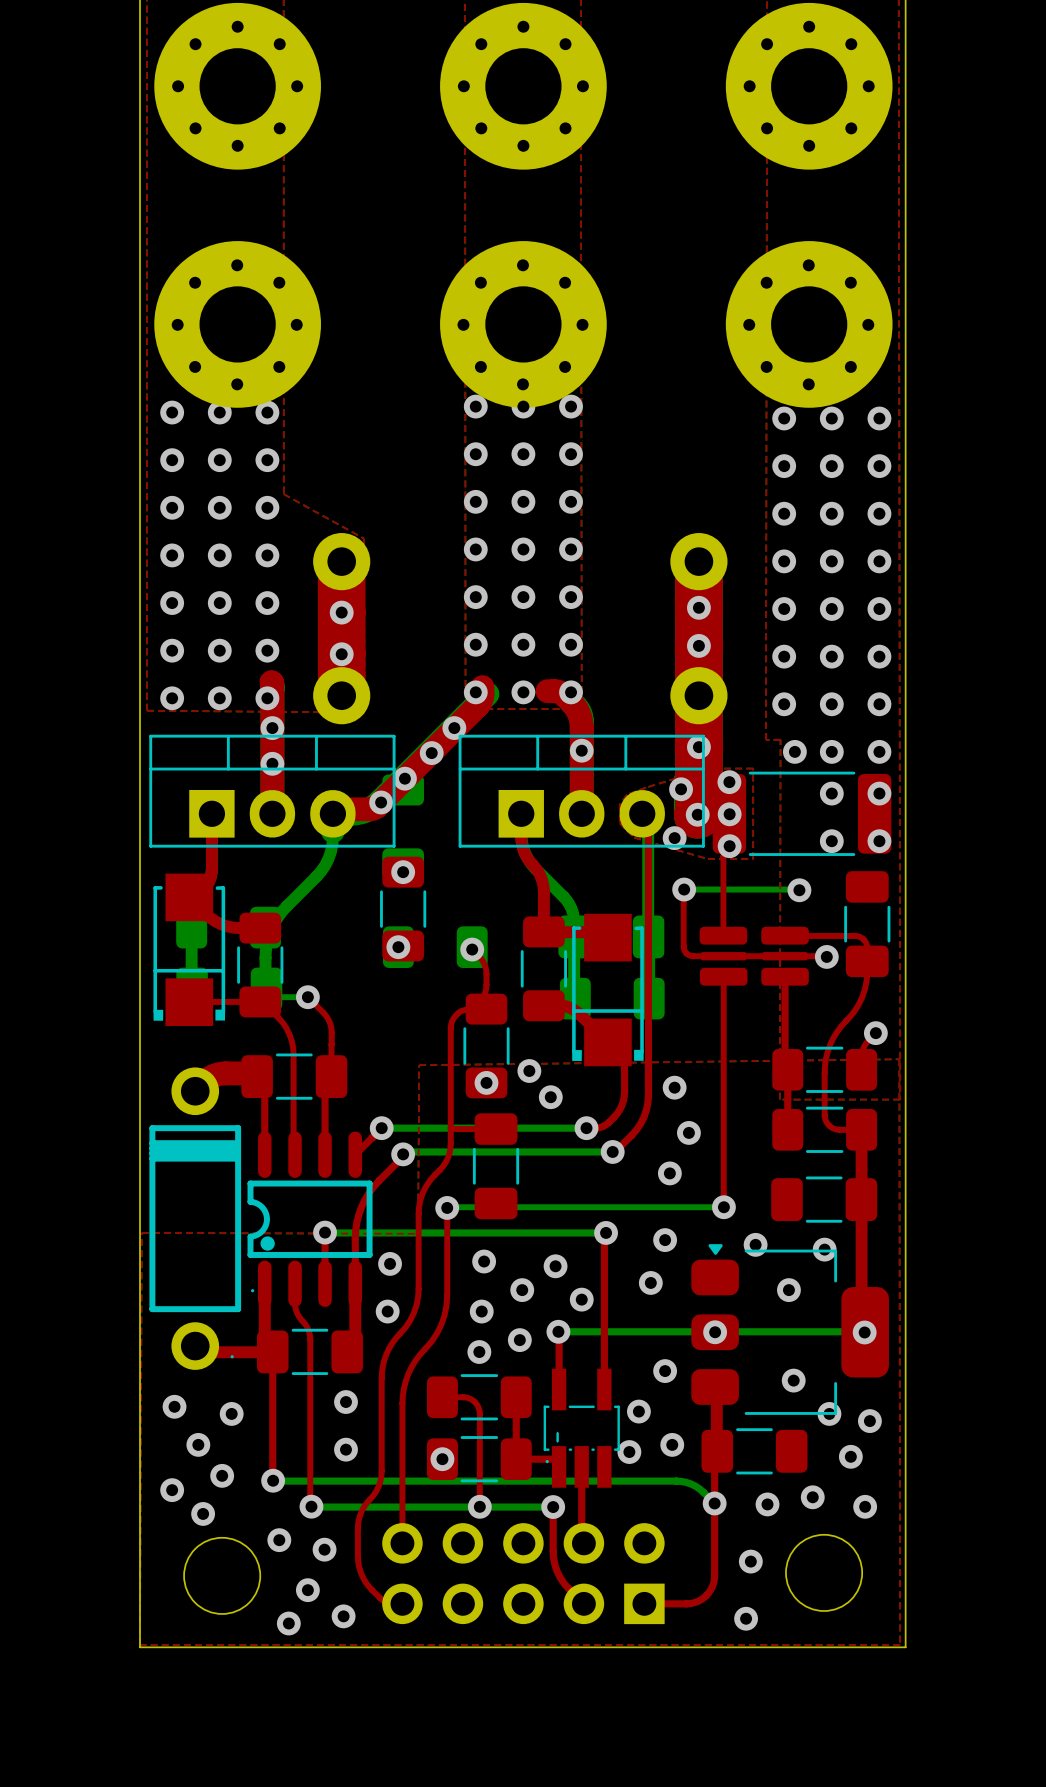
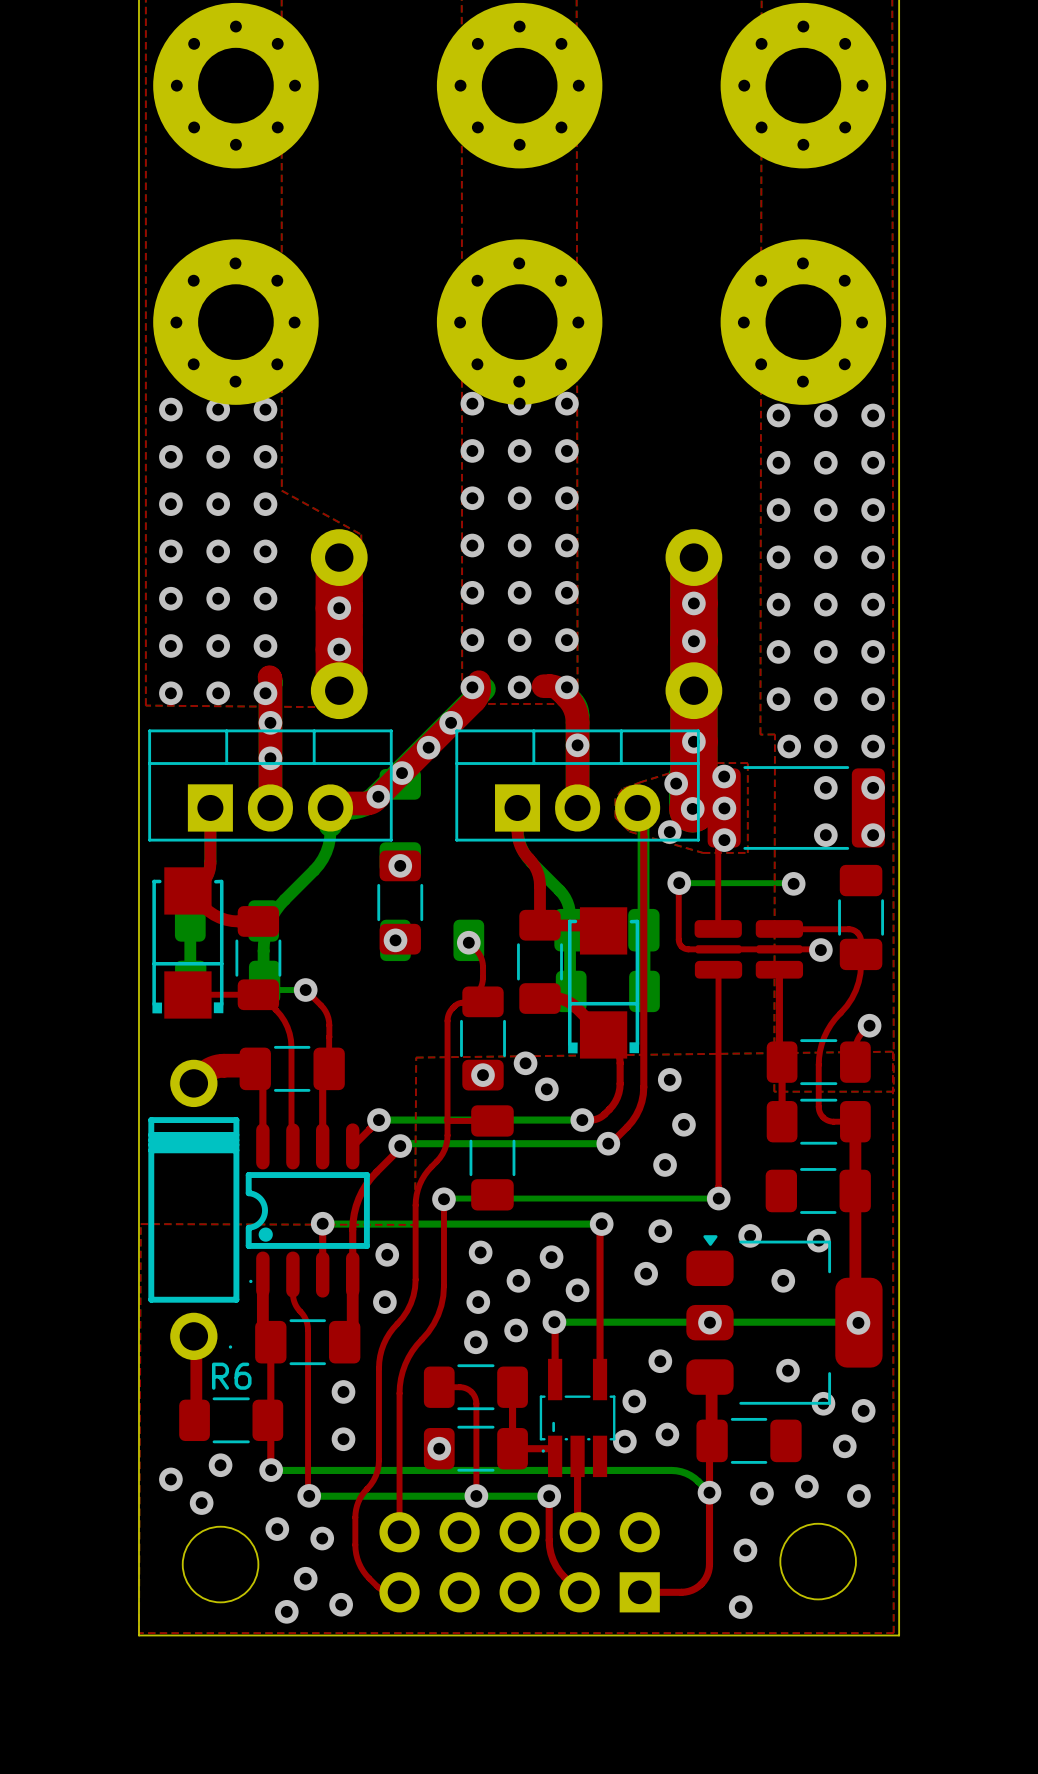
top track: none -> (193, 1336) (196, 1338) (196, 1409)
top track: (205, 1352) (272, 1352) -> none
via: (174, 1406) -> none
via: (231, 1413) -> none
R6: none -> (231, 1420)
via: (198, 1444) -> none

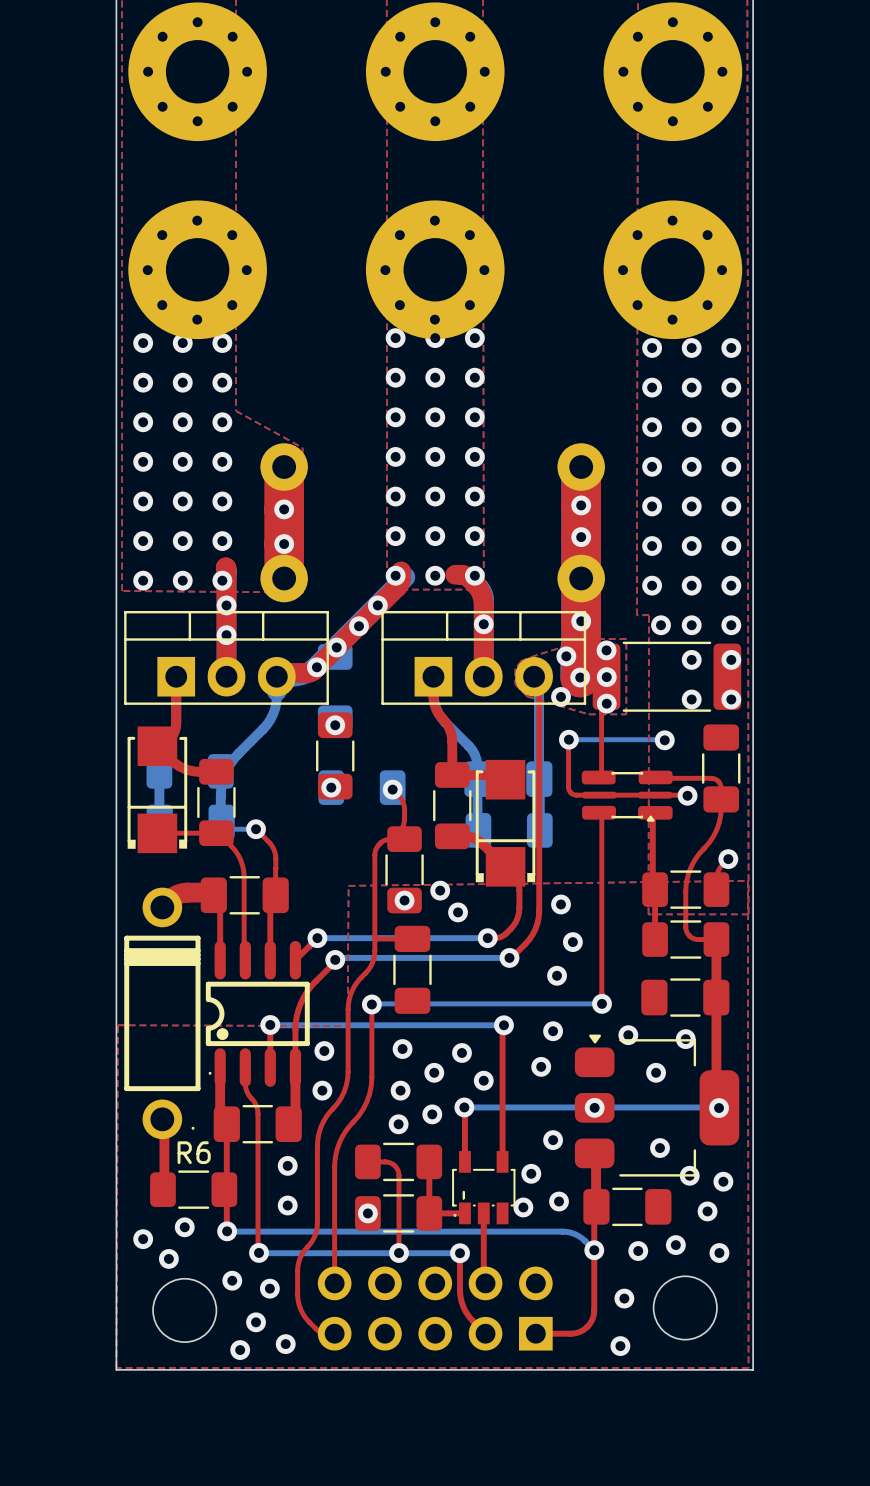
part footprint: [694, 920, 804, 979] -> [581, 770, 673, 822]
part footprint: [539, 1358, 616, 1478] -> [452, 1151, 516, 1225]

